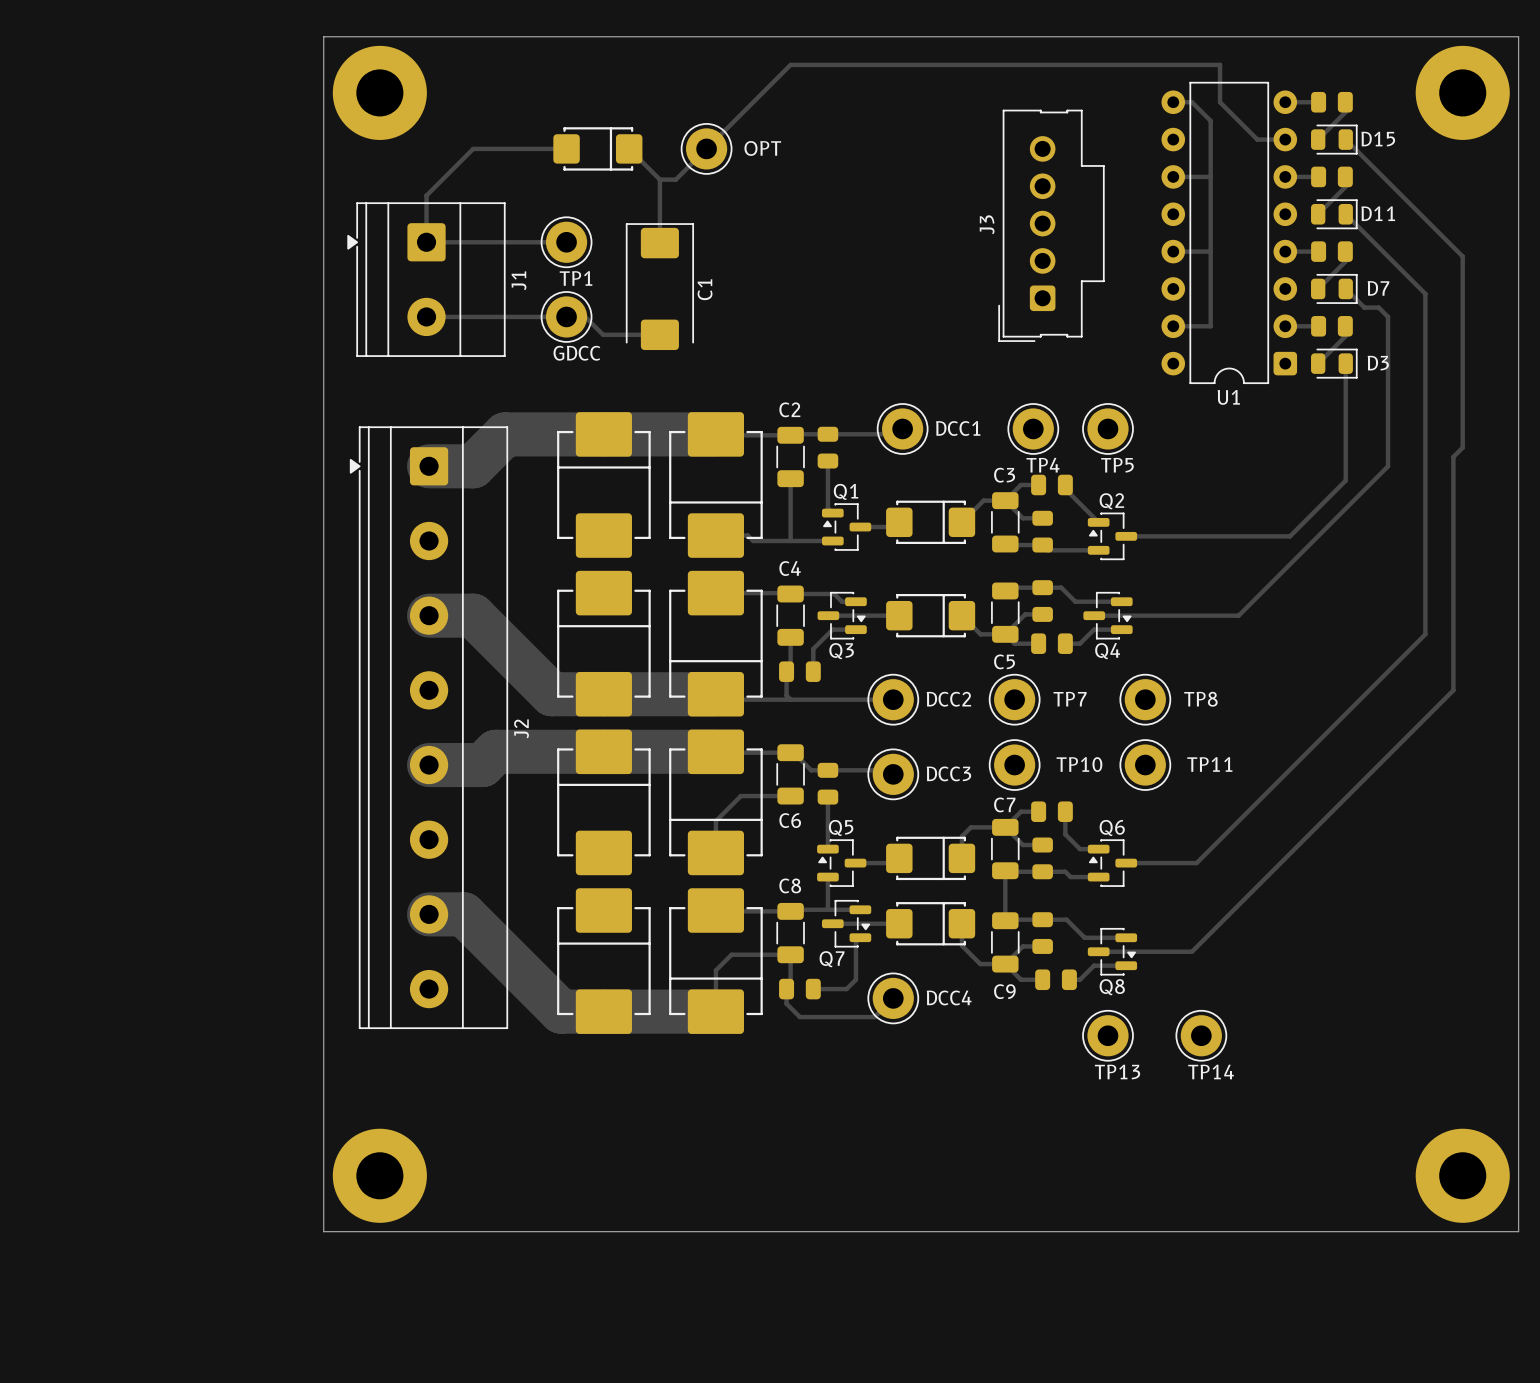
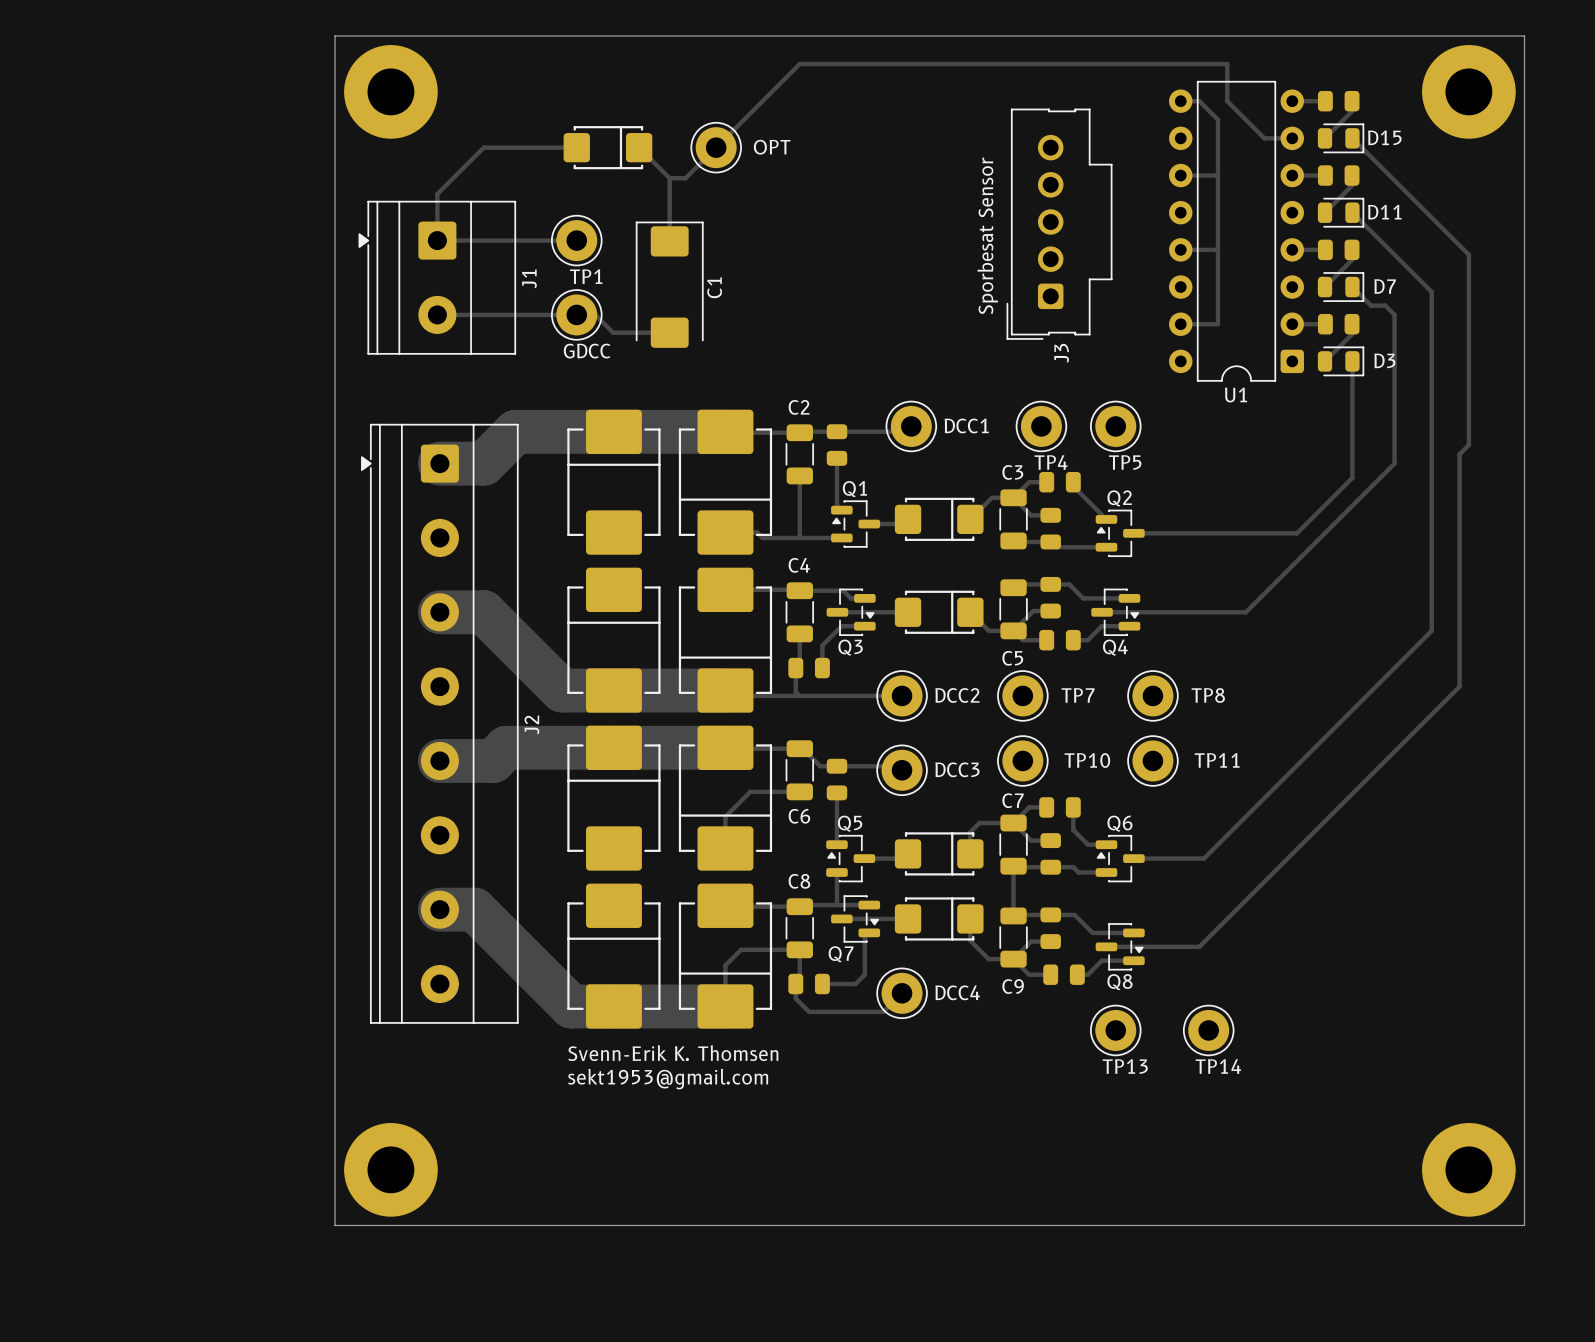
J3 name position: J3 (987, 224) -> J3 (1061, 353)
text: none -> Sporbesat Sensor (987, 235)
text: none -> Svenn-Erik K. Thomsen (673, 1053)
text: none -> sekt1953@gmail.com (668, 1079)

